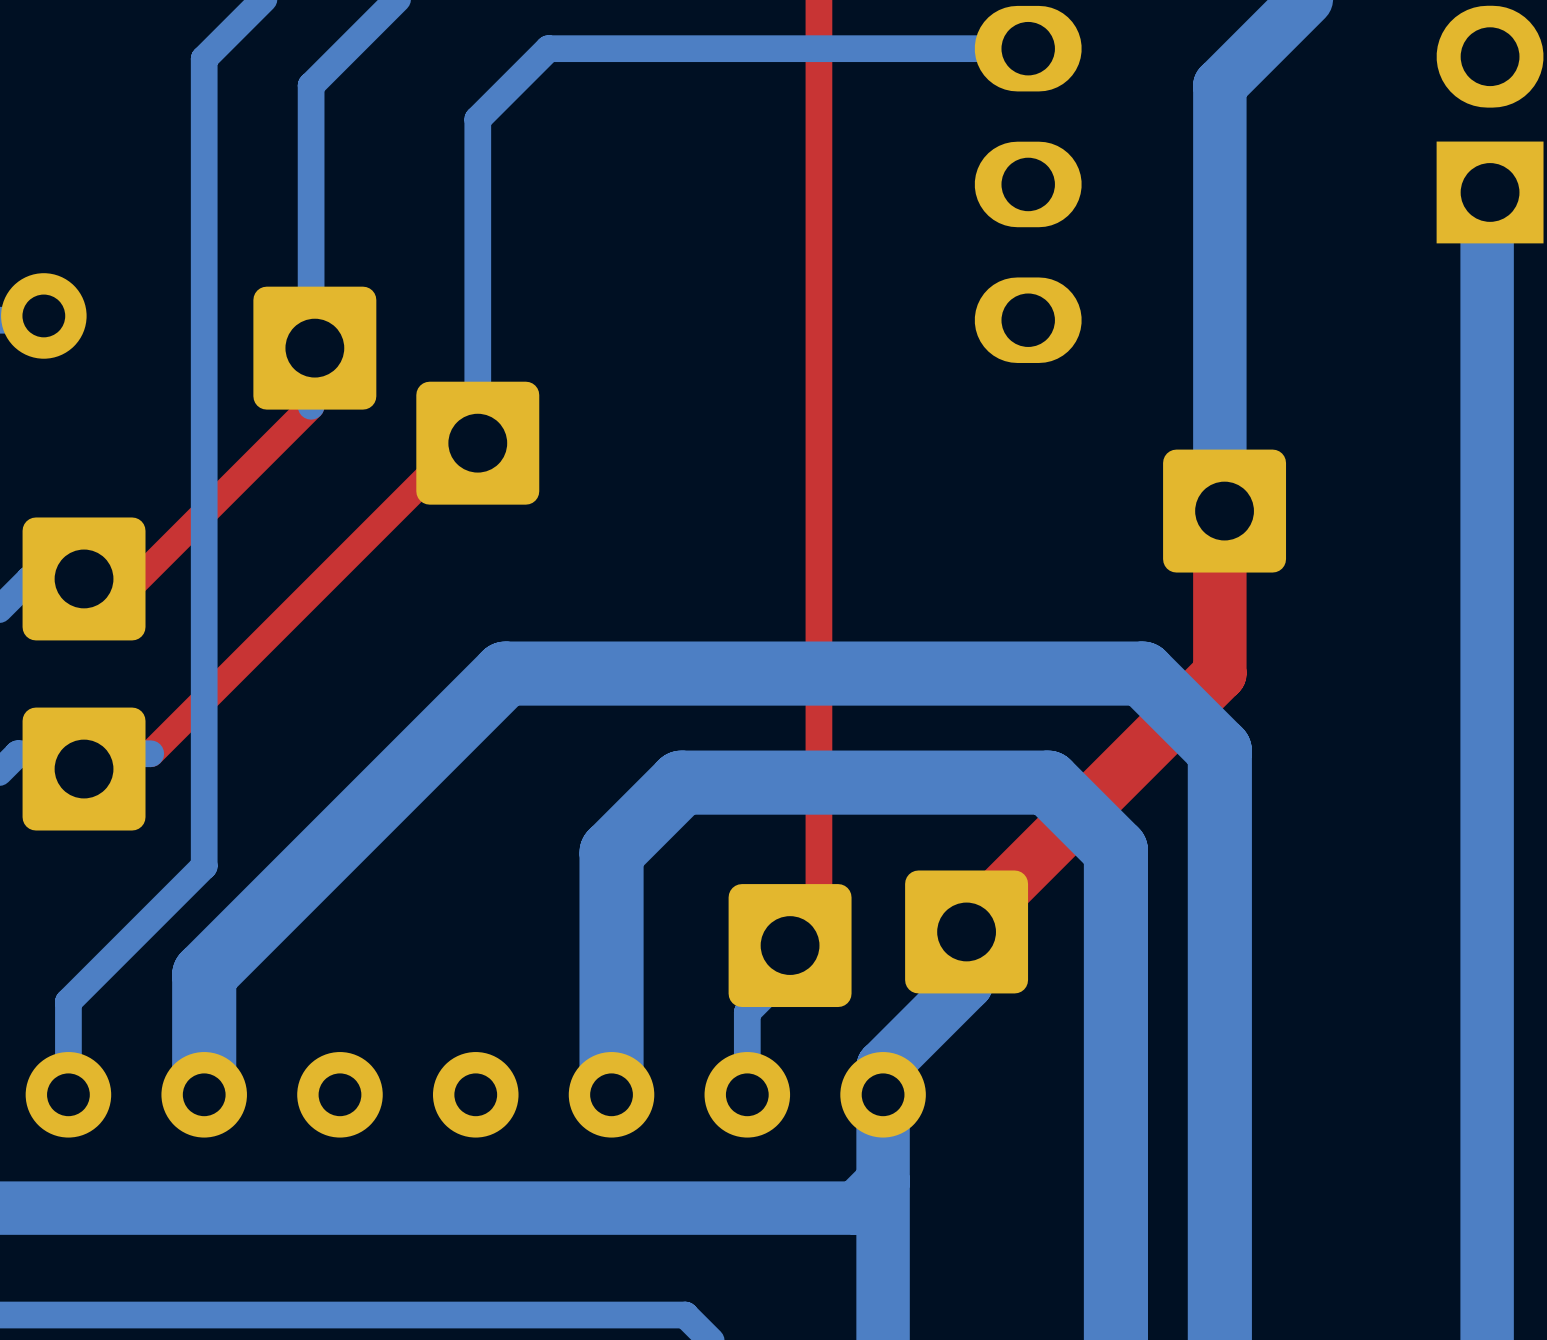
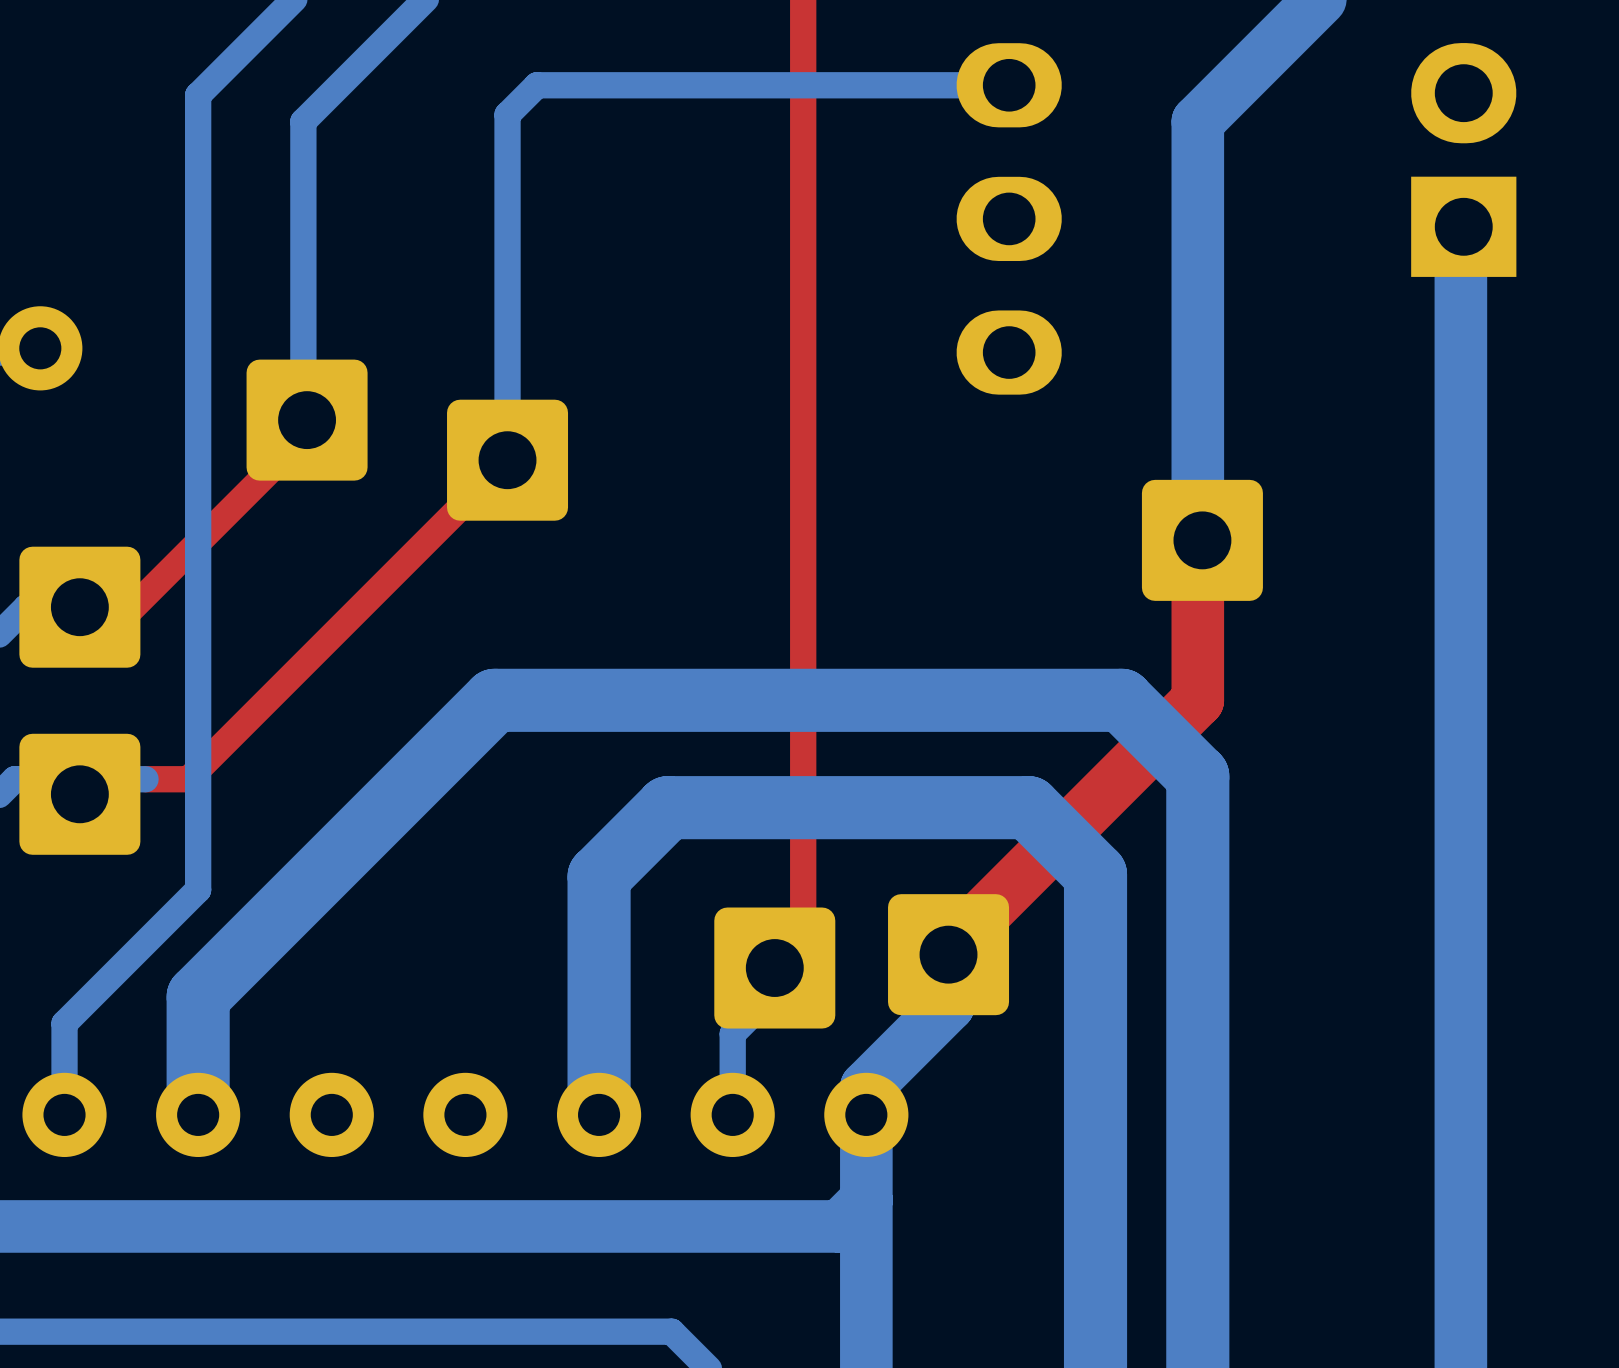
bottom track: (518, 78) (477, 119) (477, 426) (444, 459) -> (507, 114) (507, 460)
part position: (314, 348) -> (307, 420)
part position: (477, 443) -> (507, 460)
top track: (444, 459) (150, 753) -> (507, 460) (188, 779) (145, 779)

